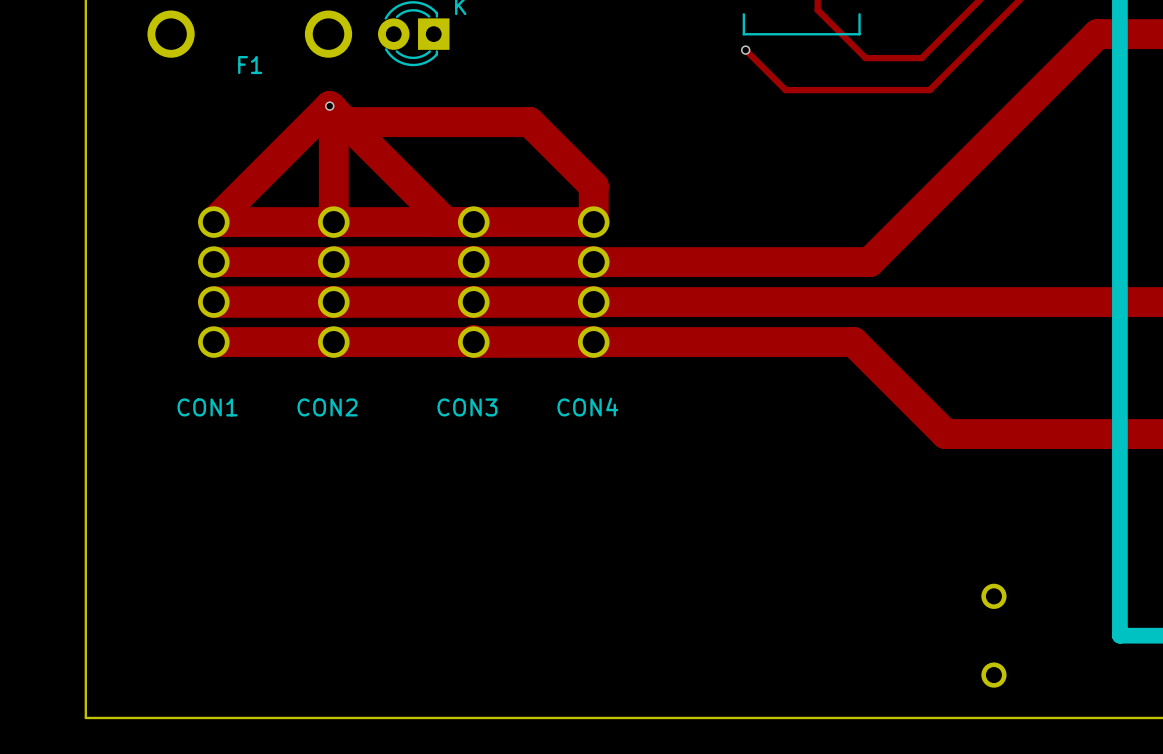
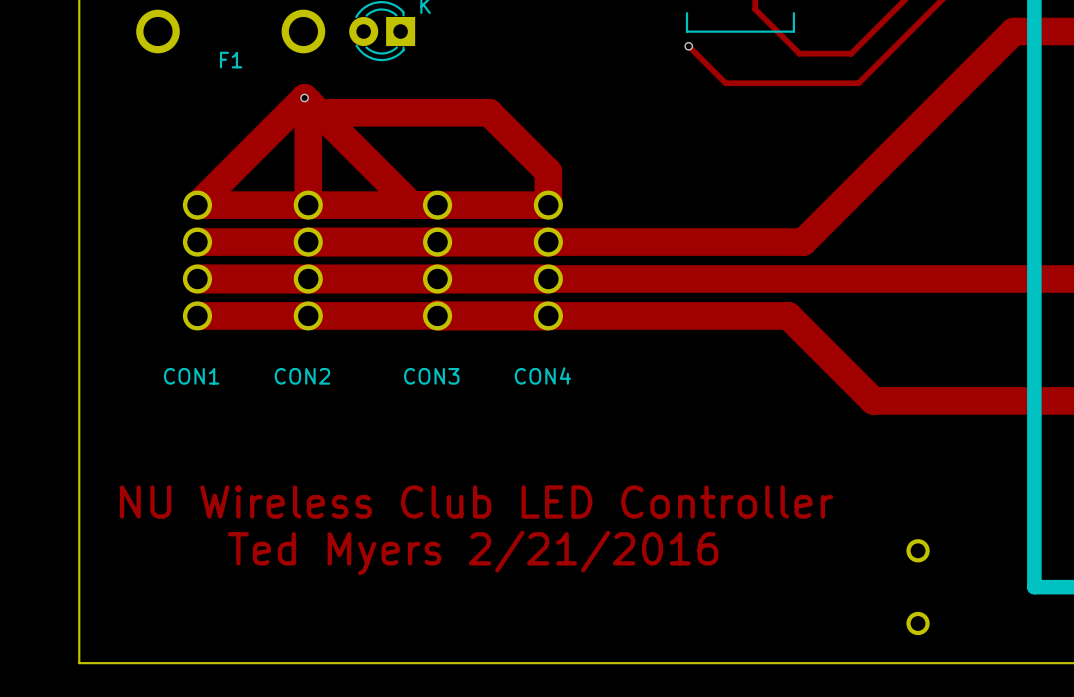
text: none -> NU Wireless Club LED Controller (476, 501)
text: none -> Ted Myers 2/21/2016 (473, 552)

